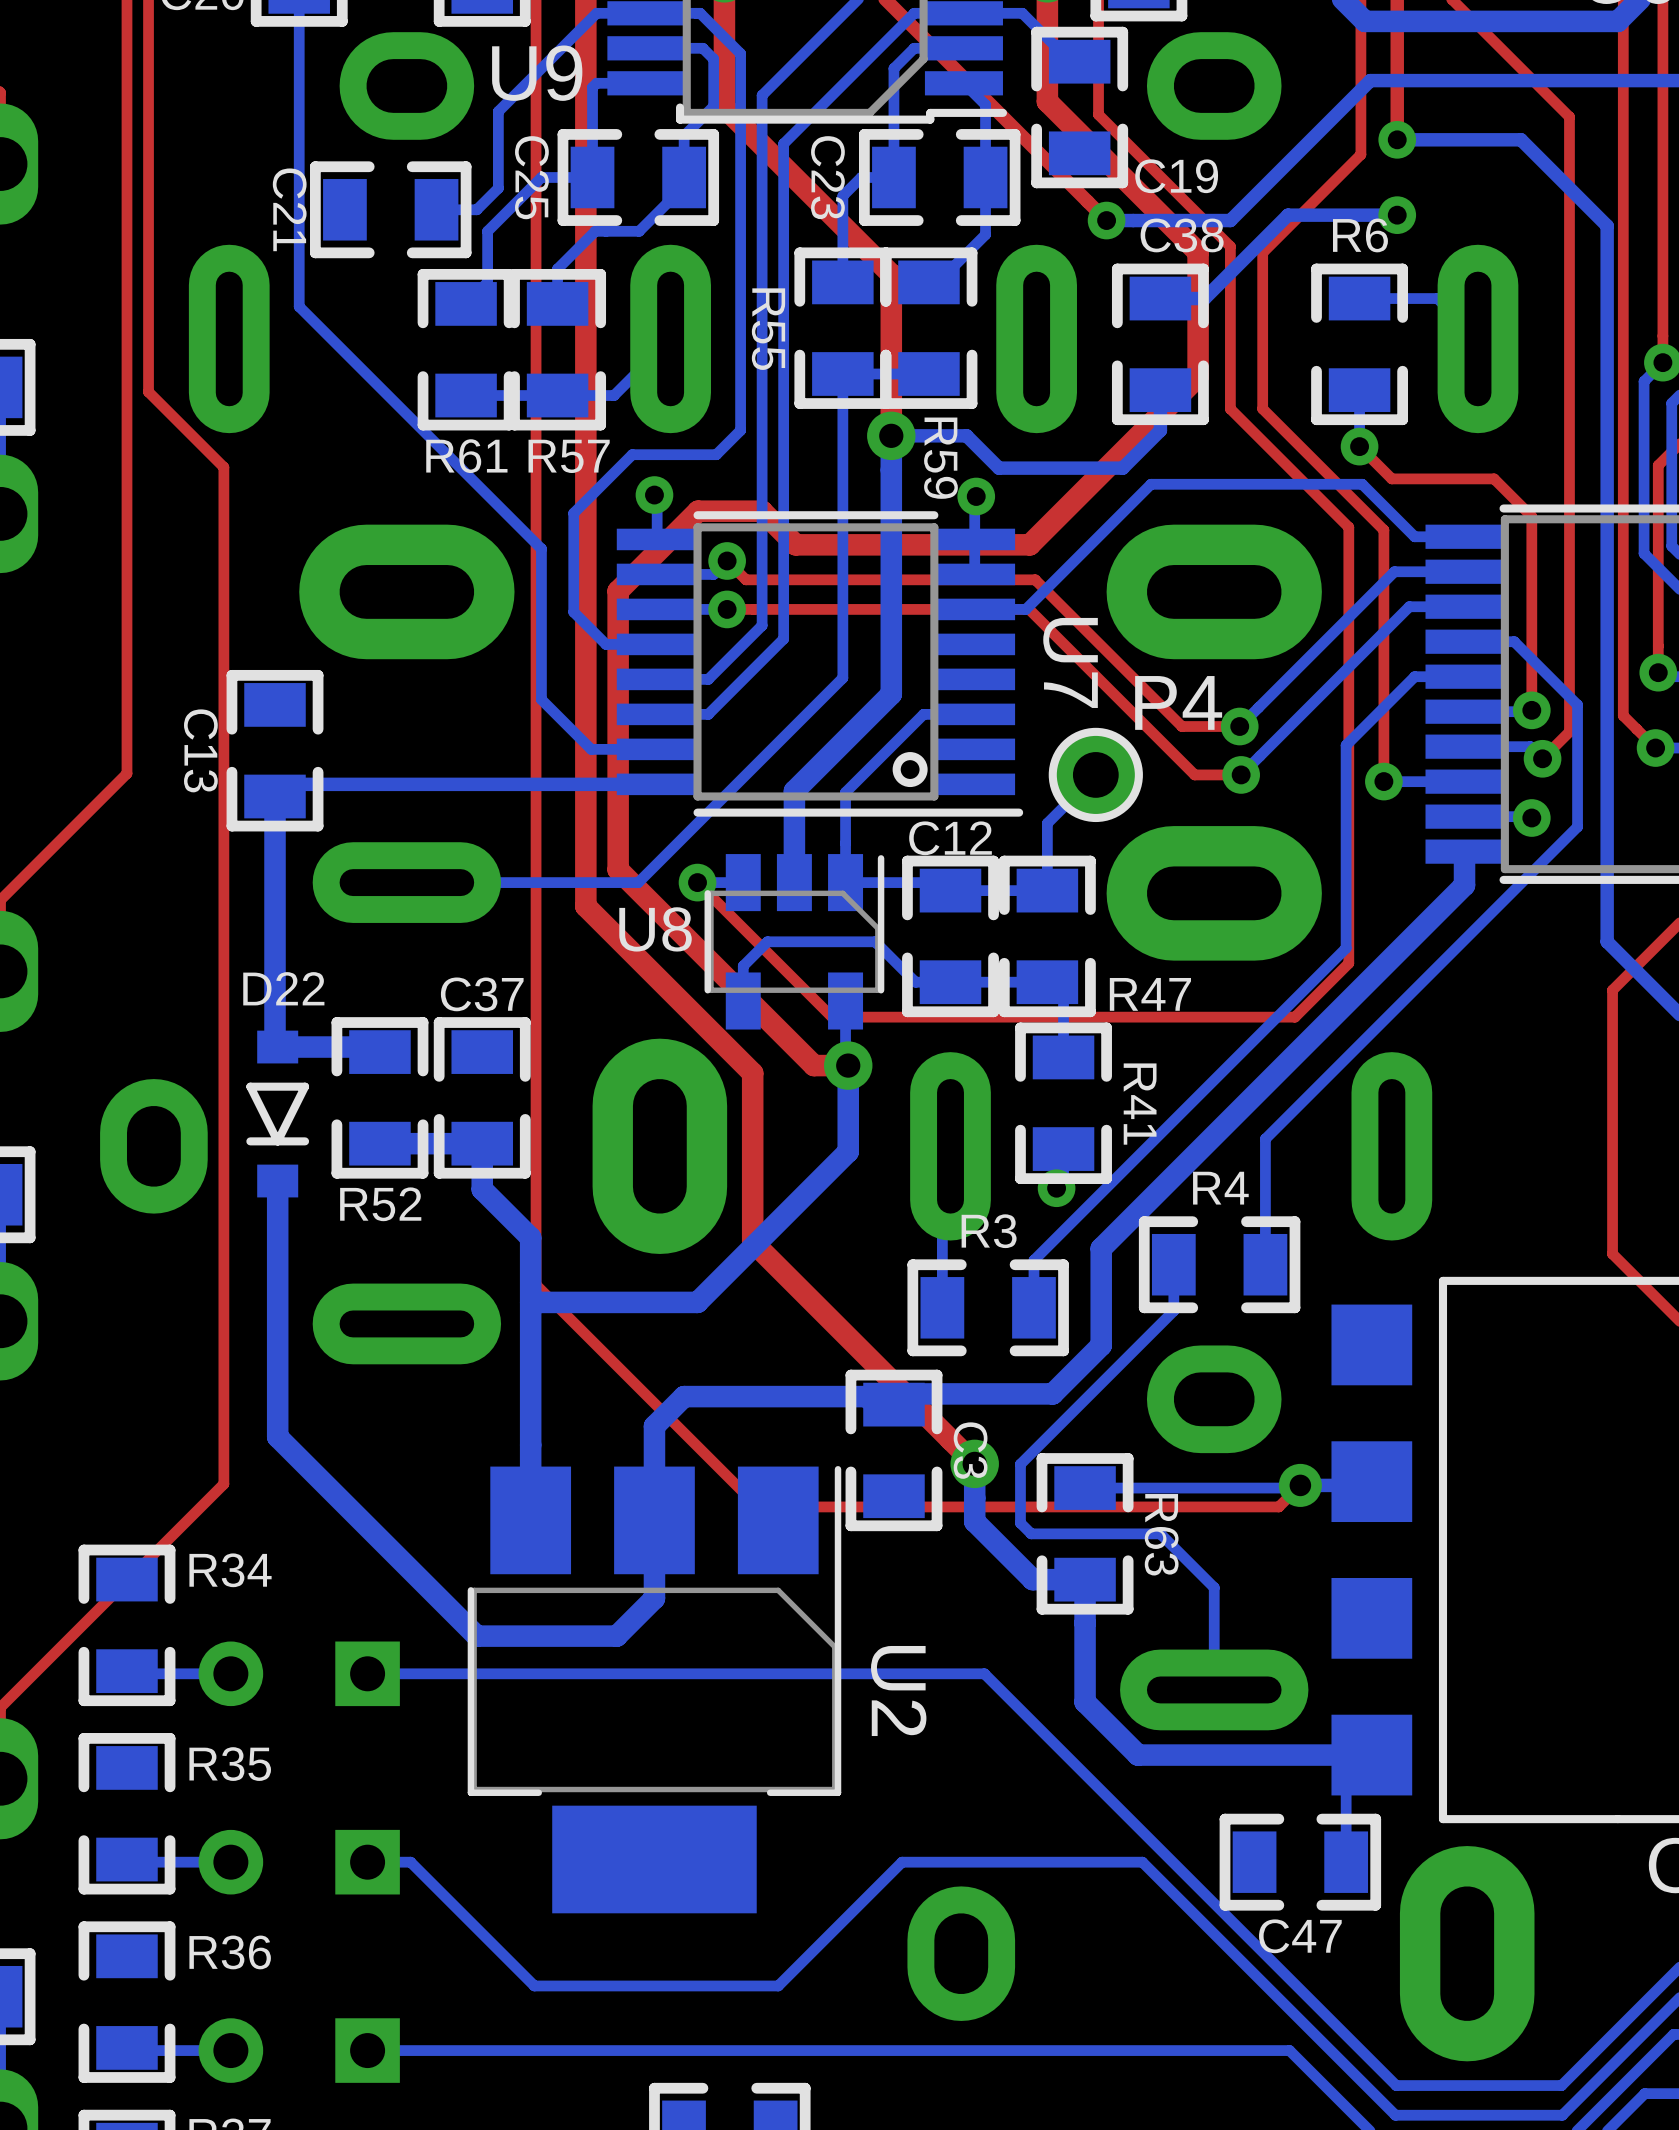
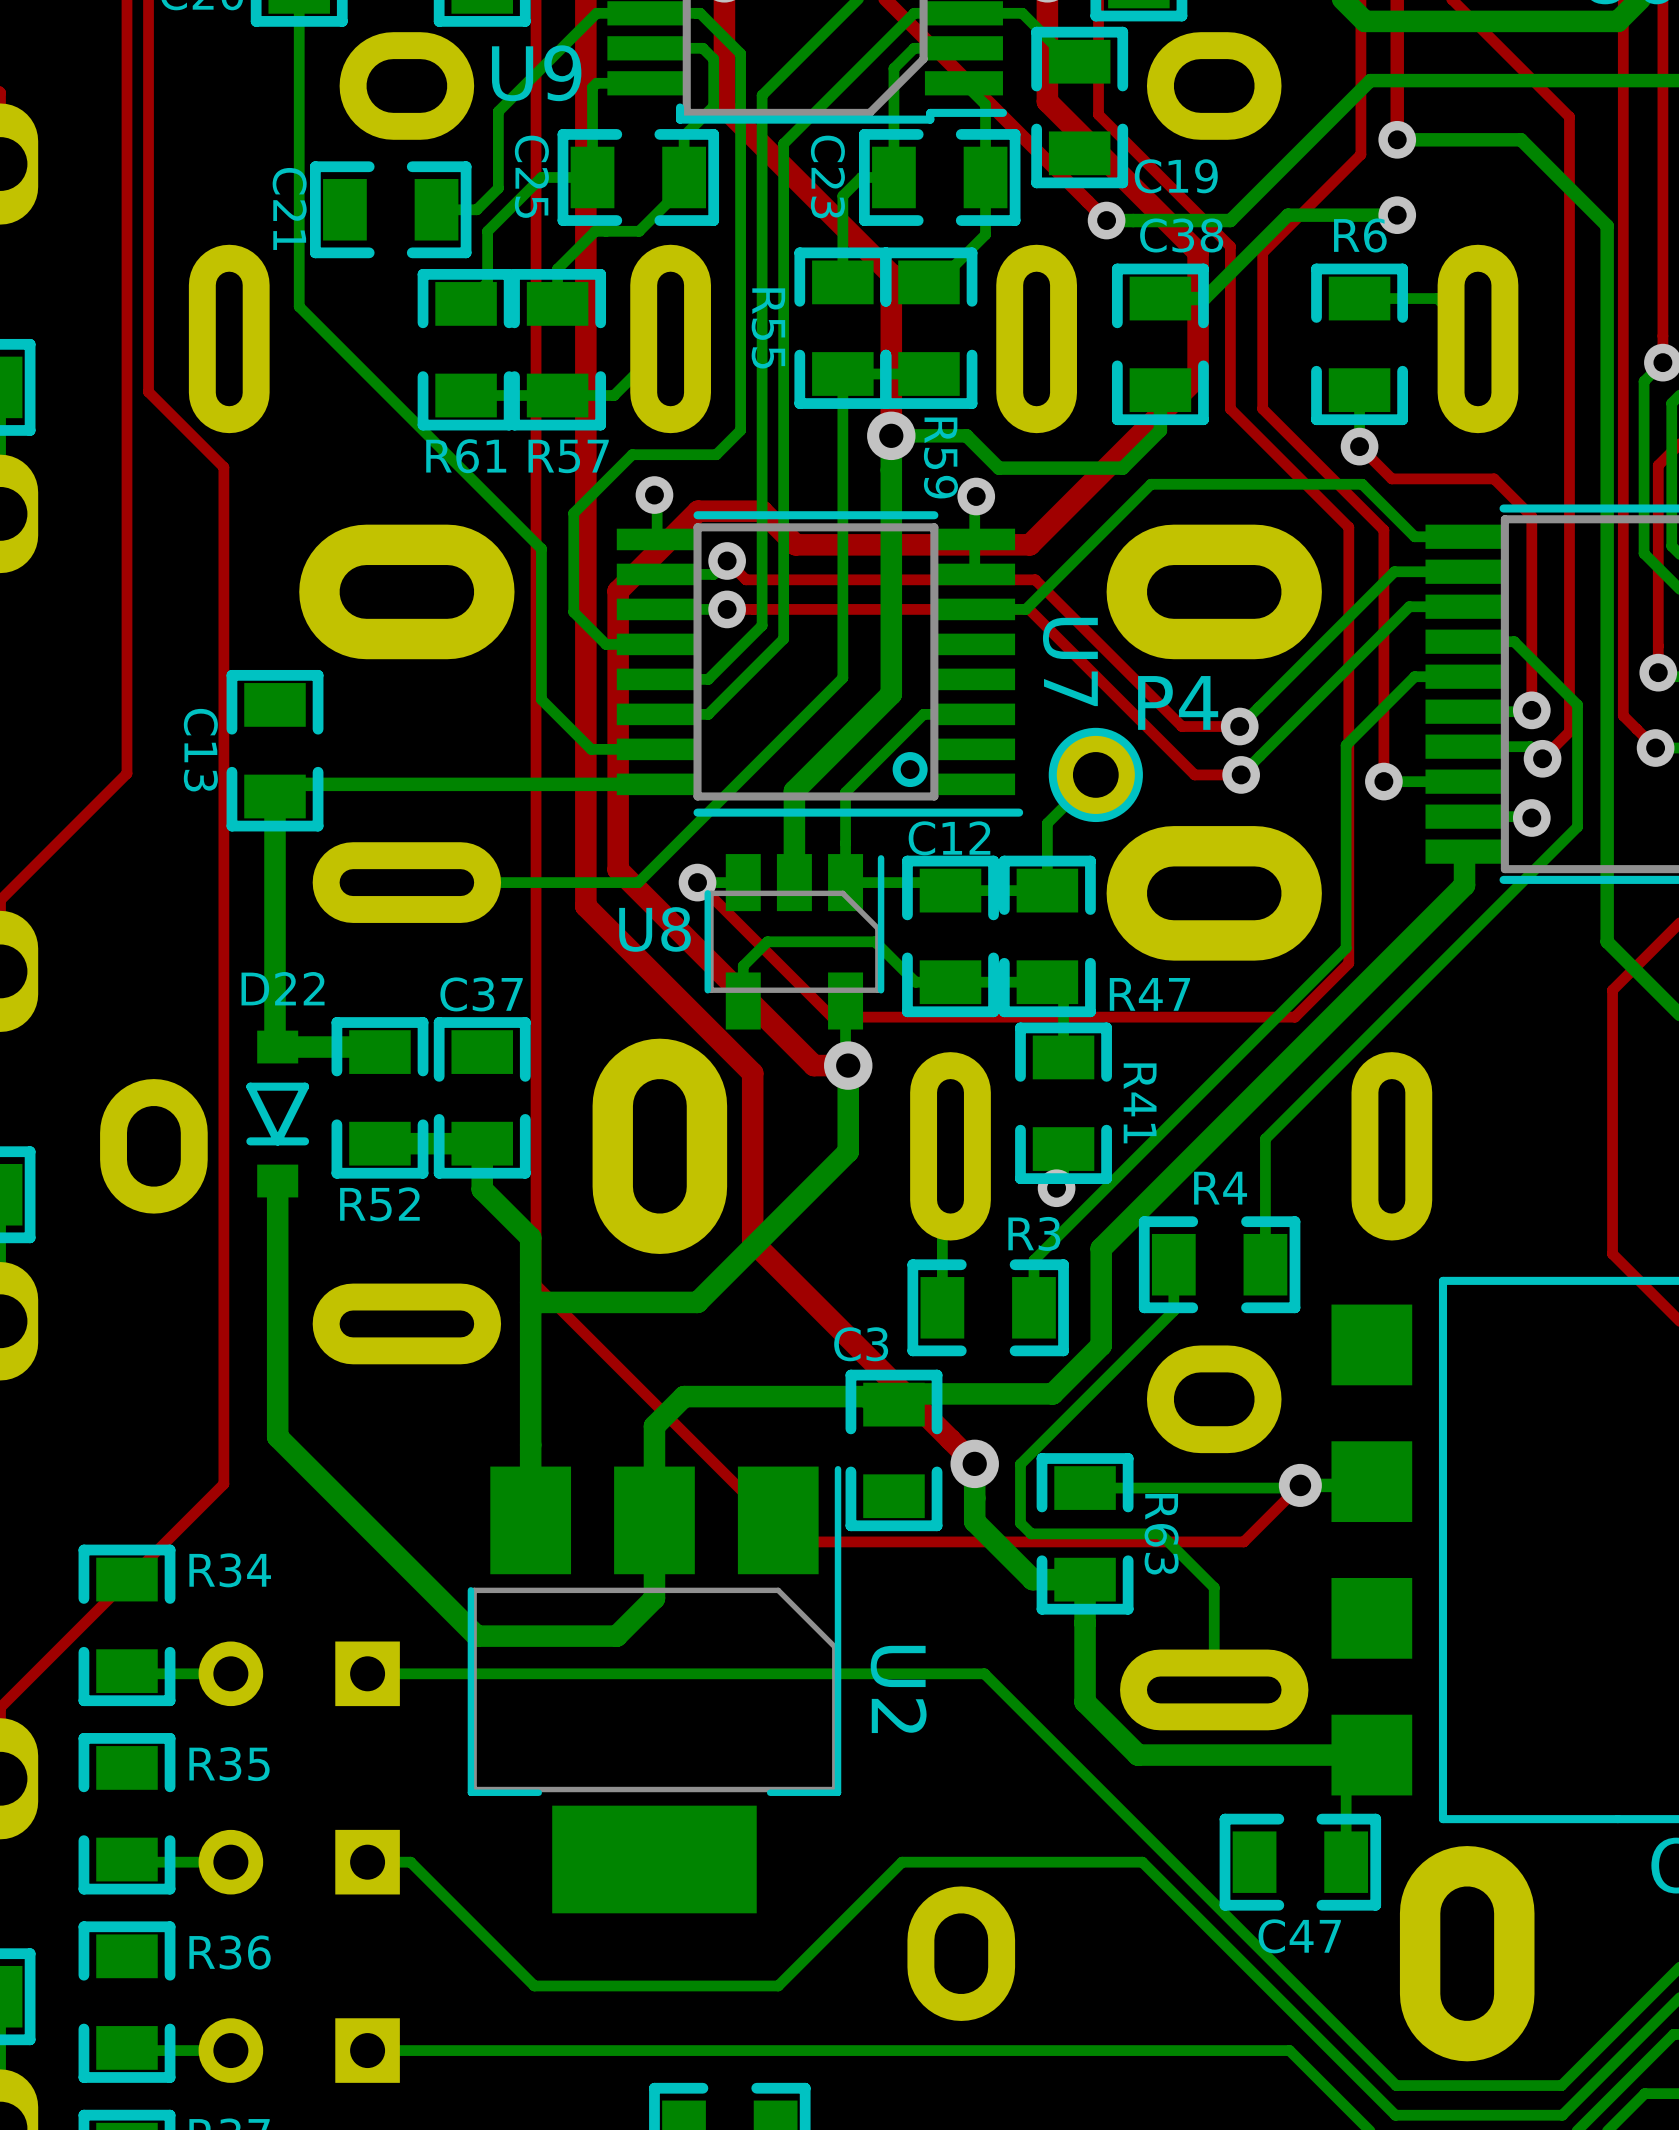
R3 name position: R3 (989, 1231) -> R3 (1034, 1233)
C3 name rotation: 0° (970, 1450) -> 90° counterclockwise (861, 1344)
C3 name position: C3 (970, 1450) -> C3 (861, 1344)
top track: (1278, 1506) (758, 1506) -> (1278, 1506) (1243, 1541) (793, 1541) (758, 1506)

